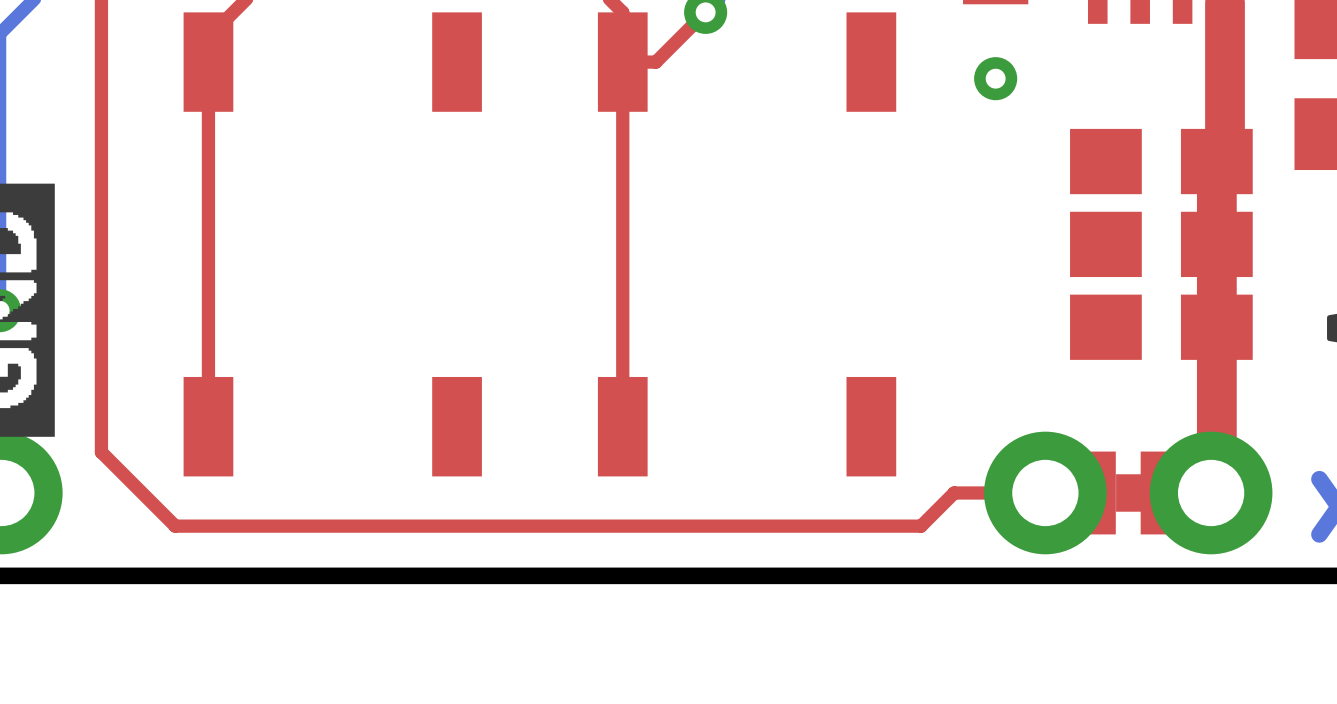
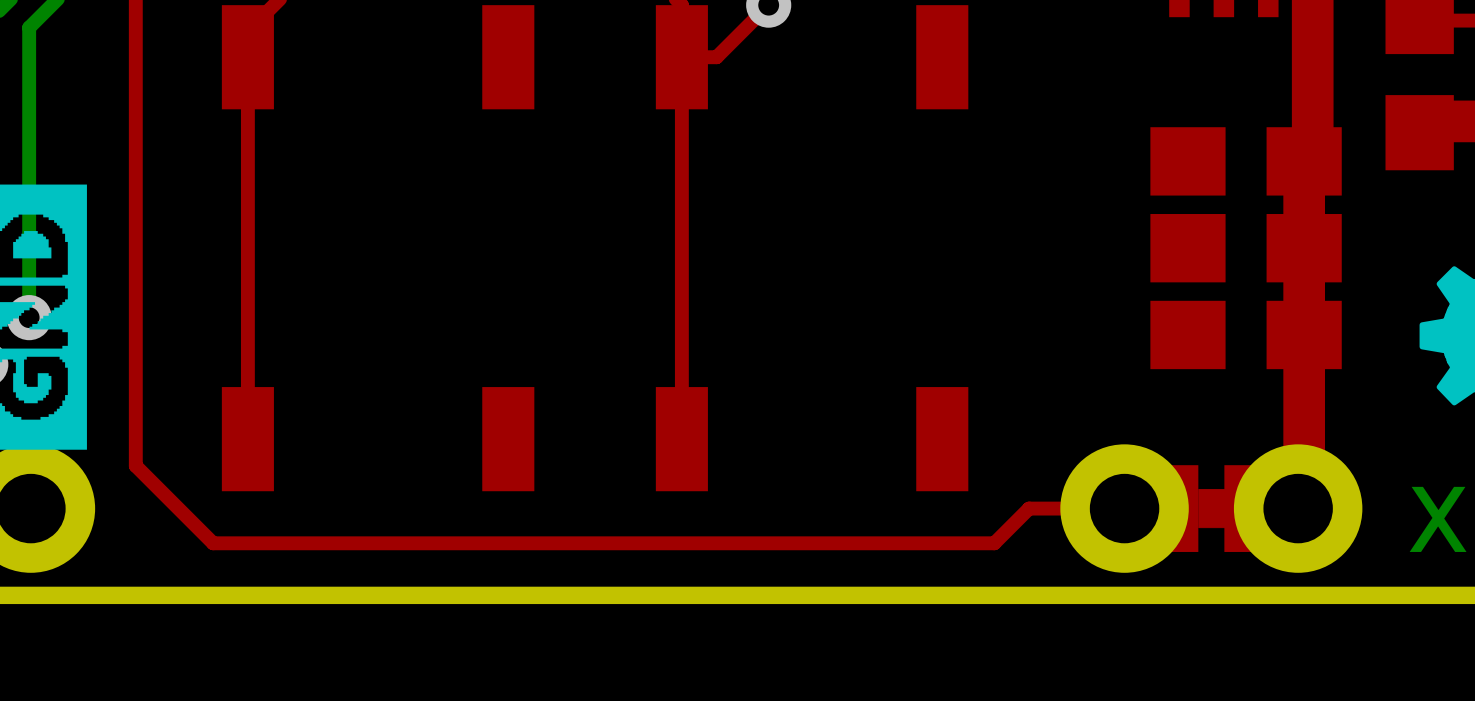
via: (995, 78) -> none

